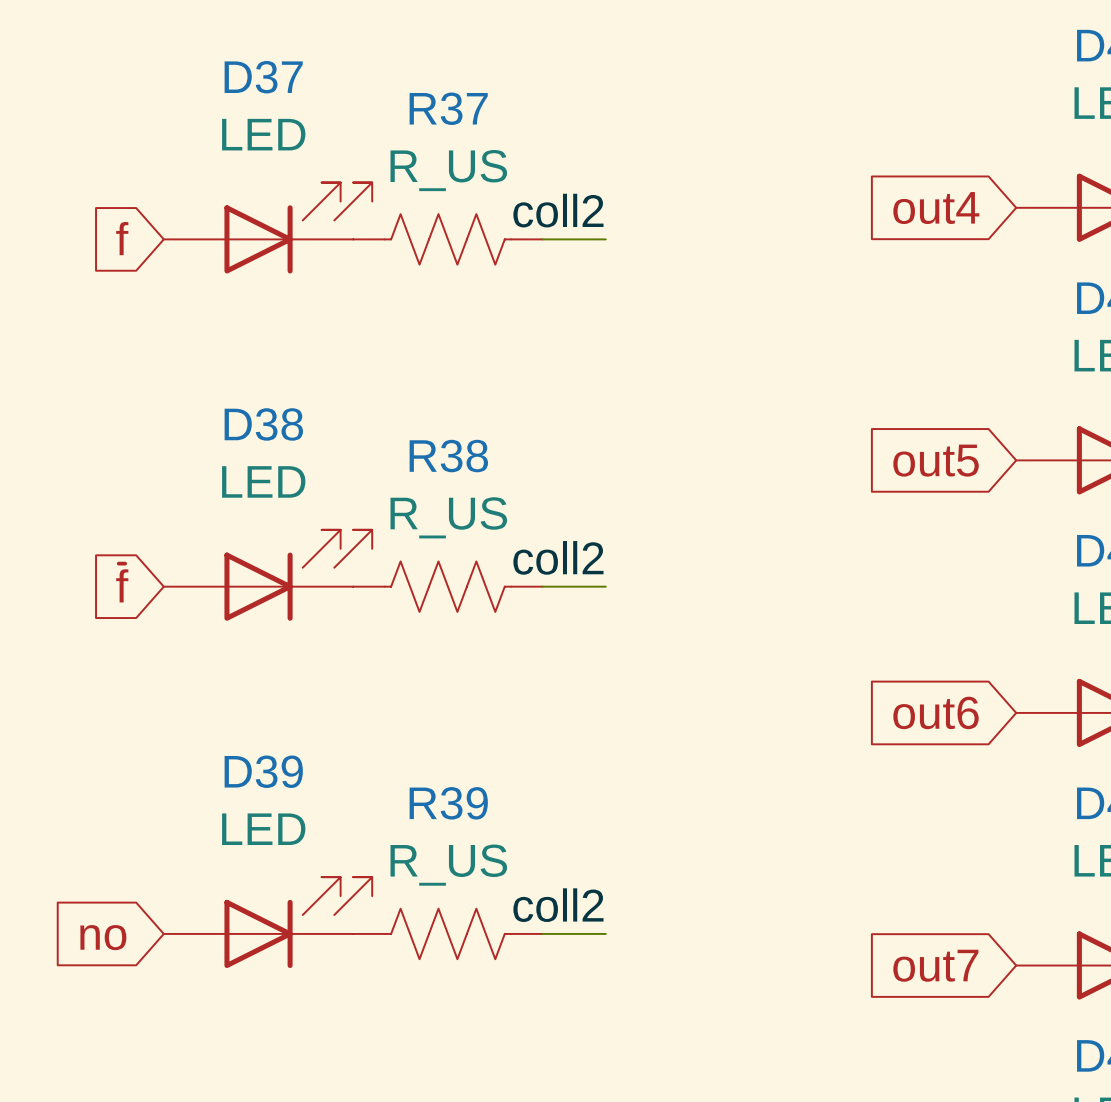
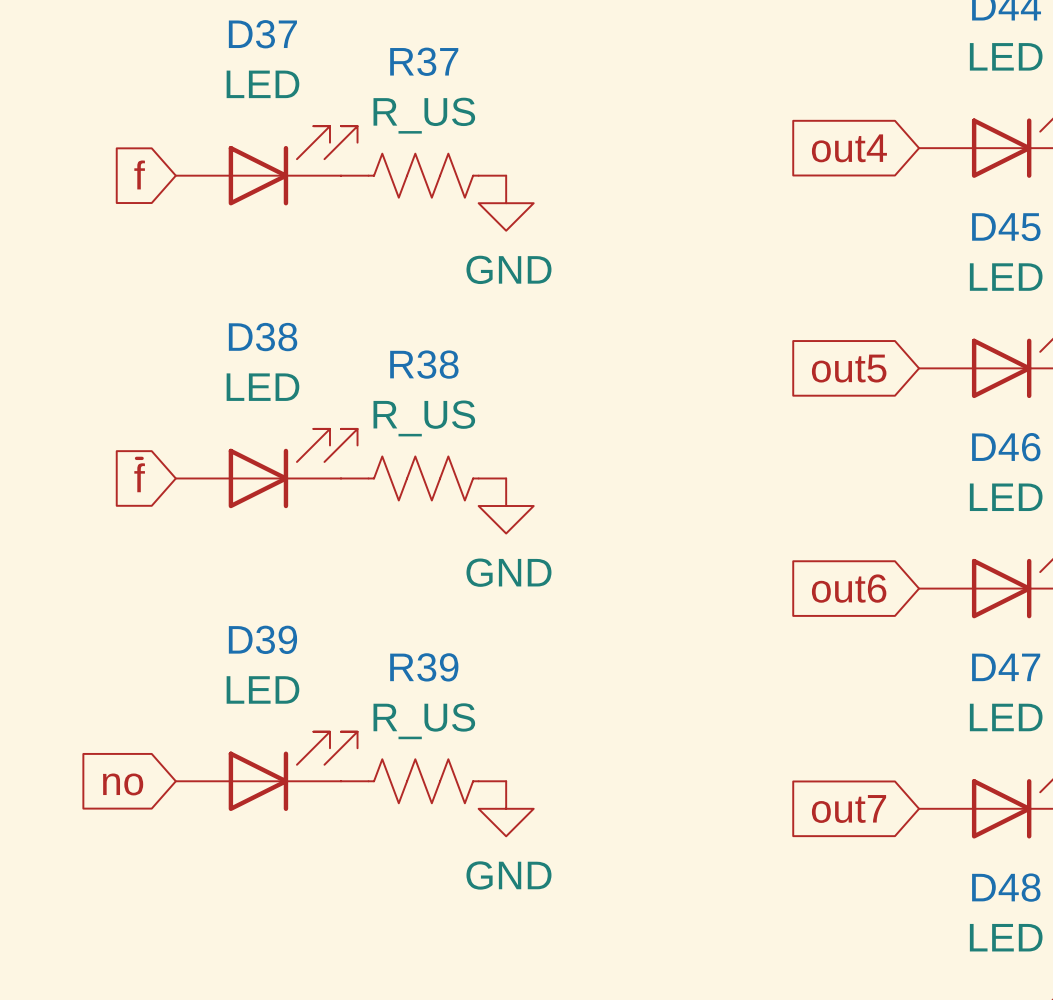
label: coll2 (558, 210) -> none
wire: (542, 239) (605, 239) -> none
power symbol: none -> GND (506, 203)
label: coll2 (558, 557) -> none
wire: (542, 586) (605, 586) -> none
power symbol: none -> GND (506, 506)
label: coll2 (558, 905) -> none
wire: (542, 933) (605, 933) -> none
power symbol: none -> GND (506, 808)

